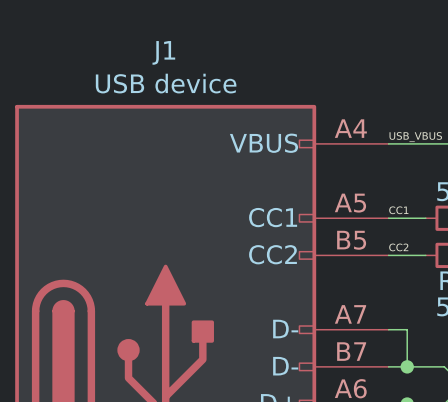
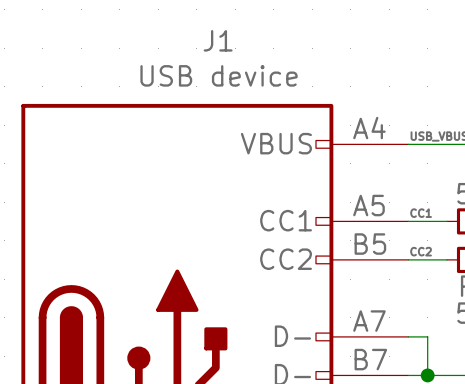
J1 name position: J1 (163, 52) -> J1 (218, 40)
J1 value position: USB device (166, 83) -> USB device (219, 75)

